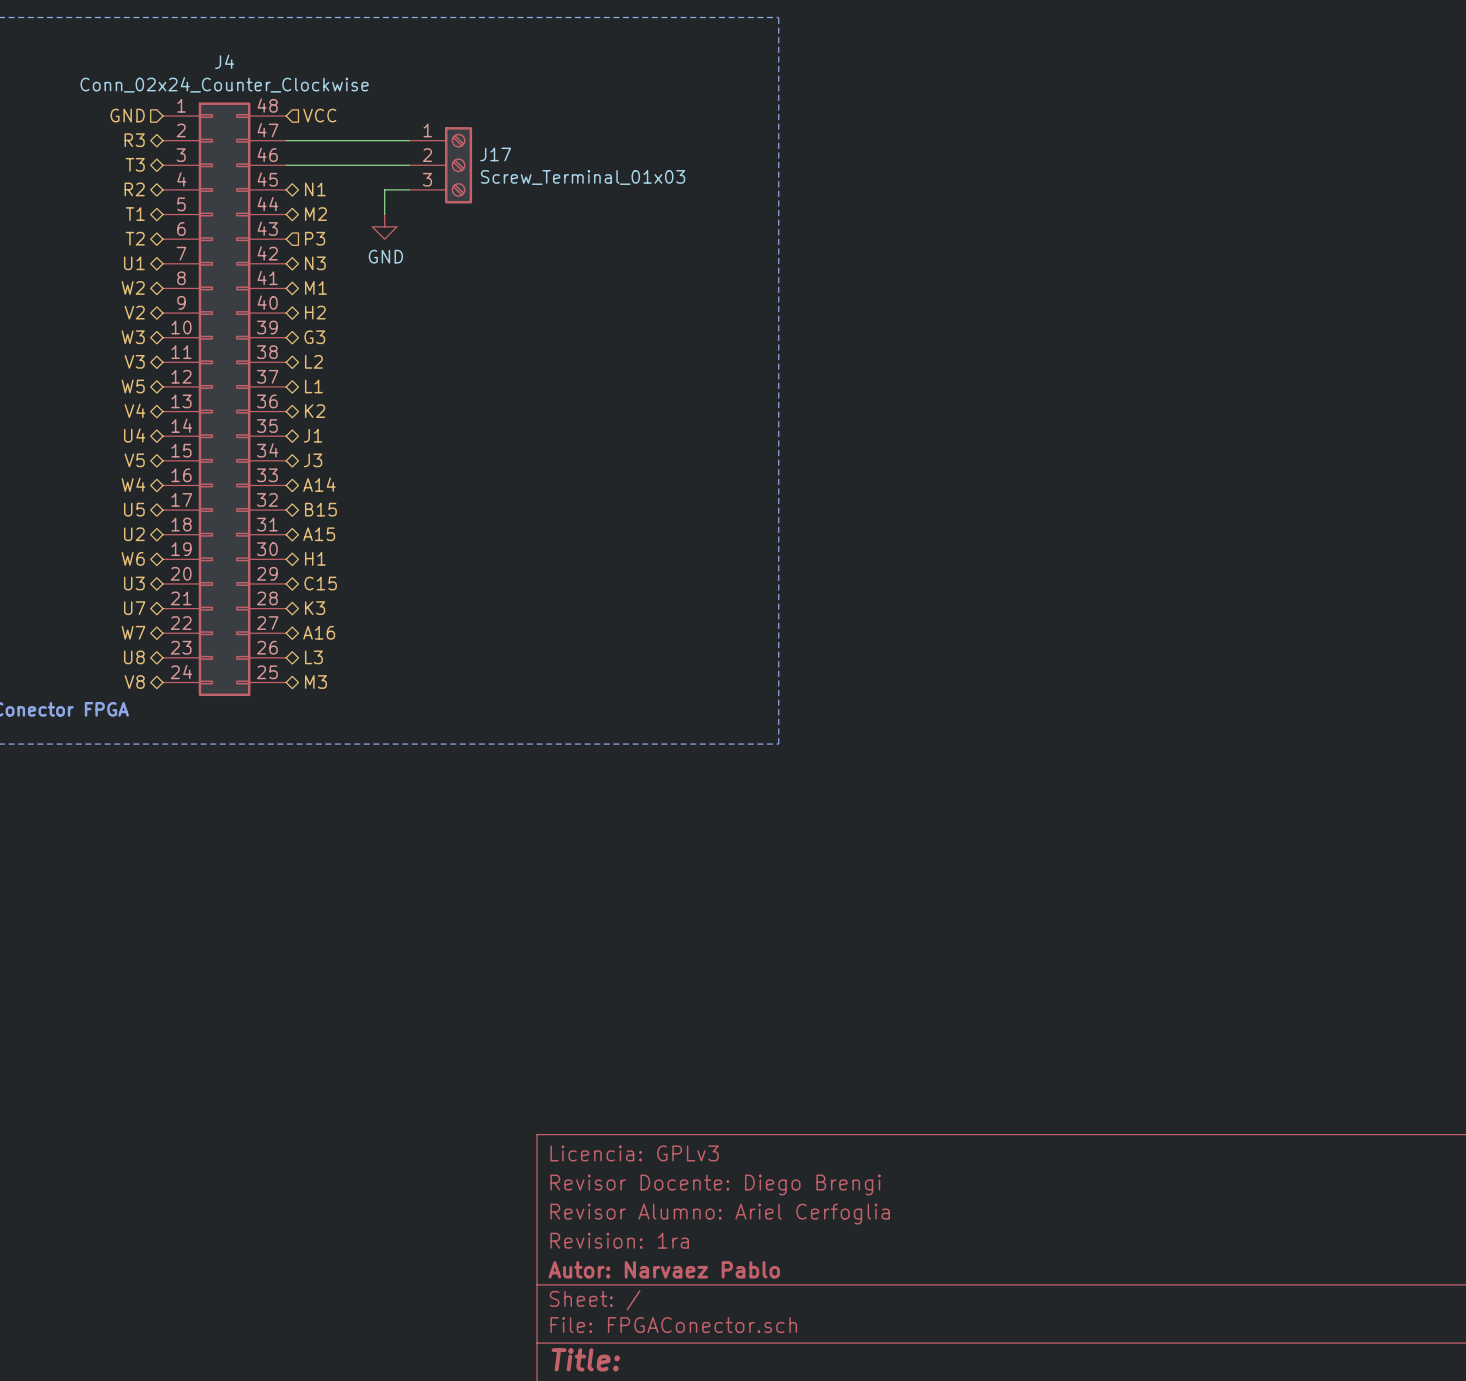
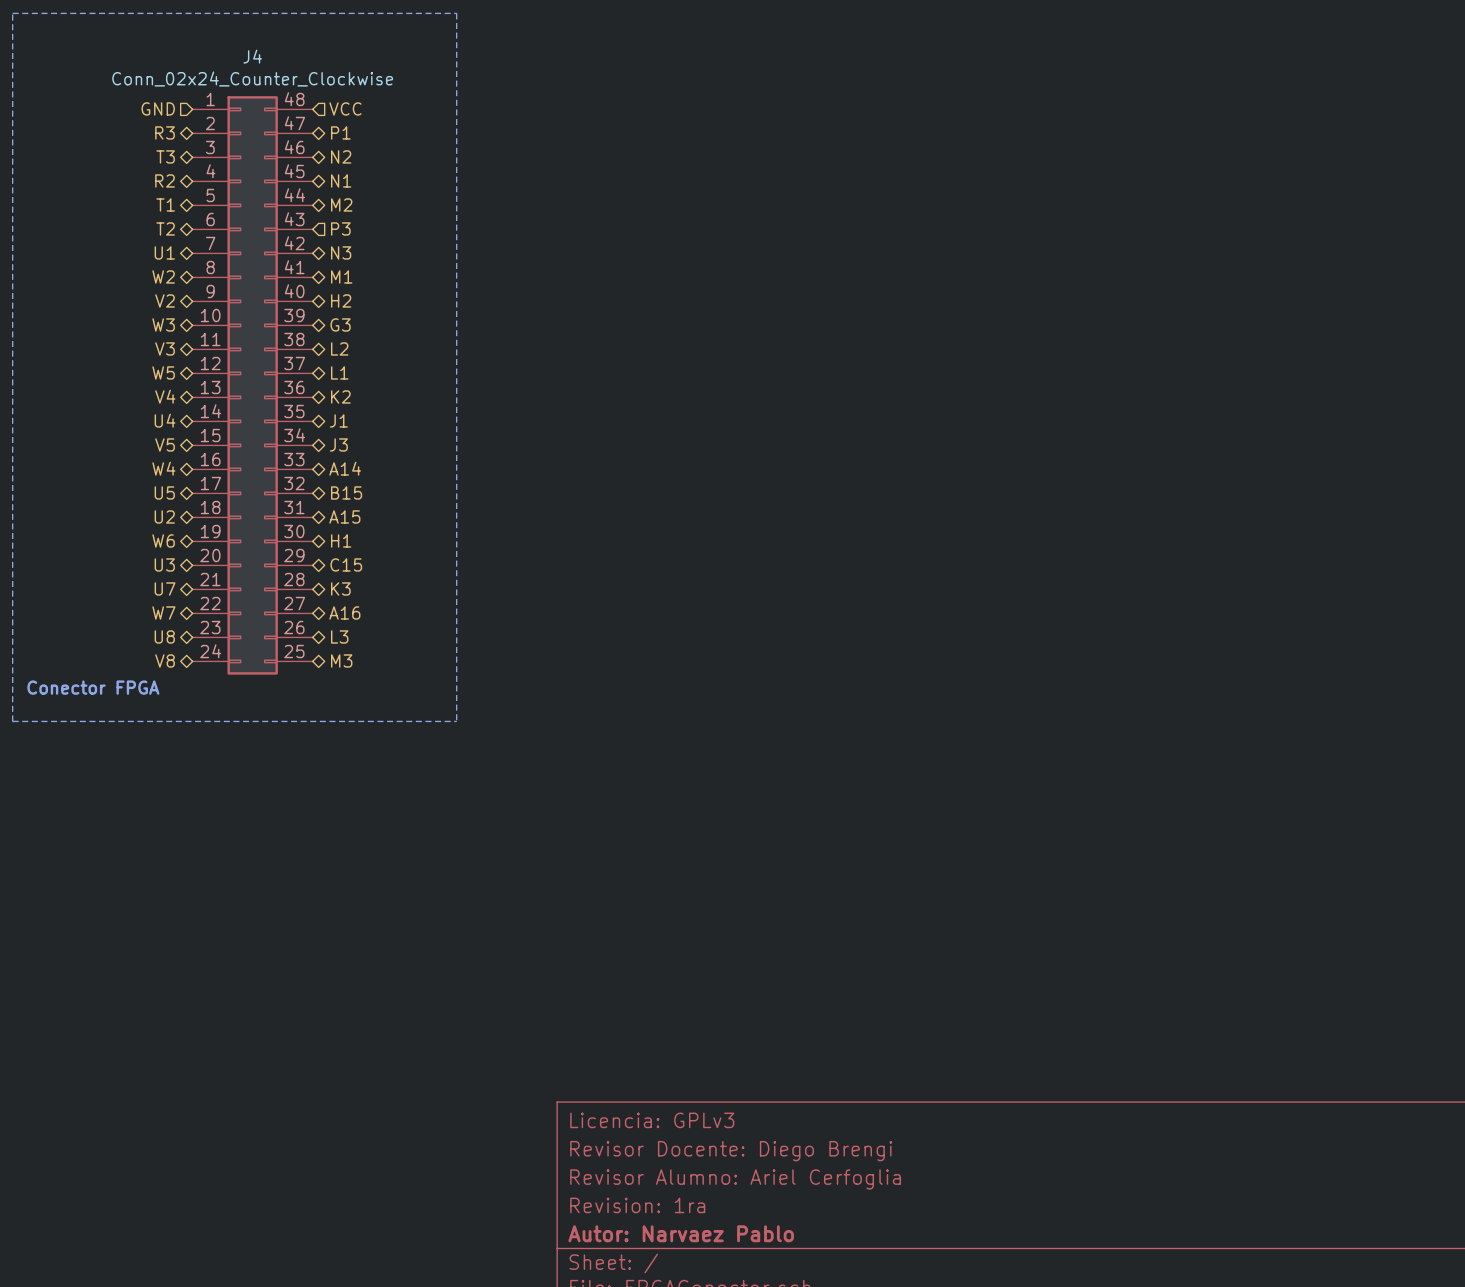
line: (433, 17) (778, 17) (778, 744) (433, 744) -> (456, 13) (456, 721)
wire: (286, 140) (409, 140) -> none
hierarchical label: none -> P1 (340, 132)
hierarchical label: none -> N2 (341, 156)
wire: (286, 165) (409, 165) -> none
J17: Screw_Terminal_01x03 (440, 165) -> none
wire: (409, 189) (384, 189) (384, 214) -> none
power symbol: GND (384, 226) -> none

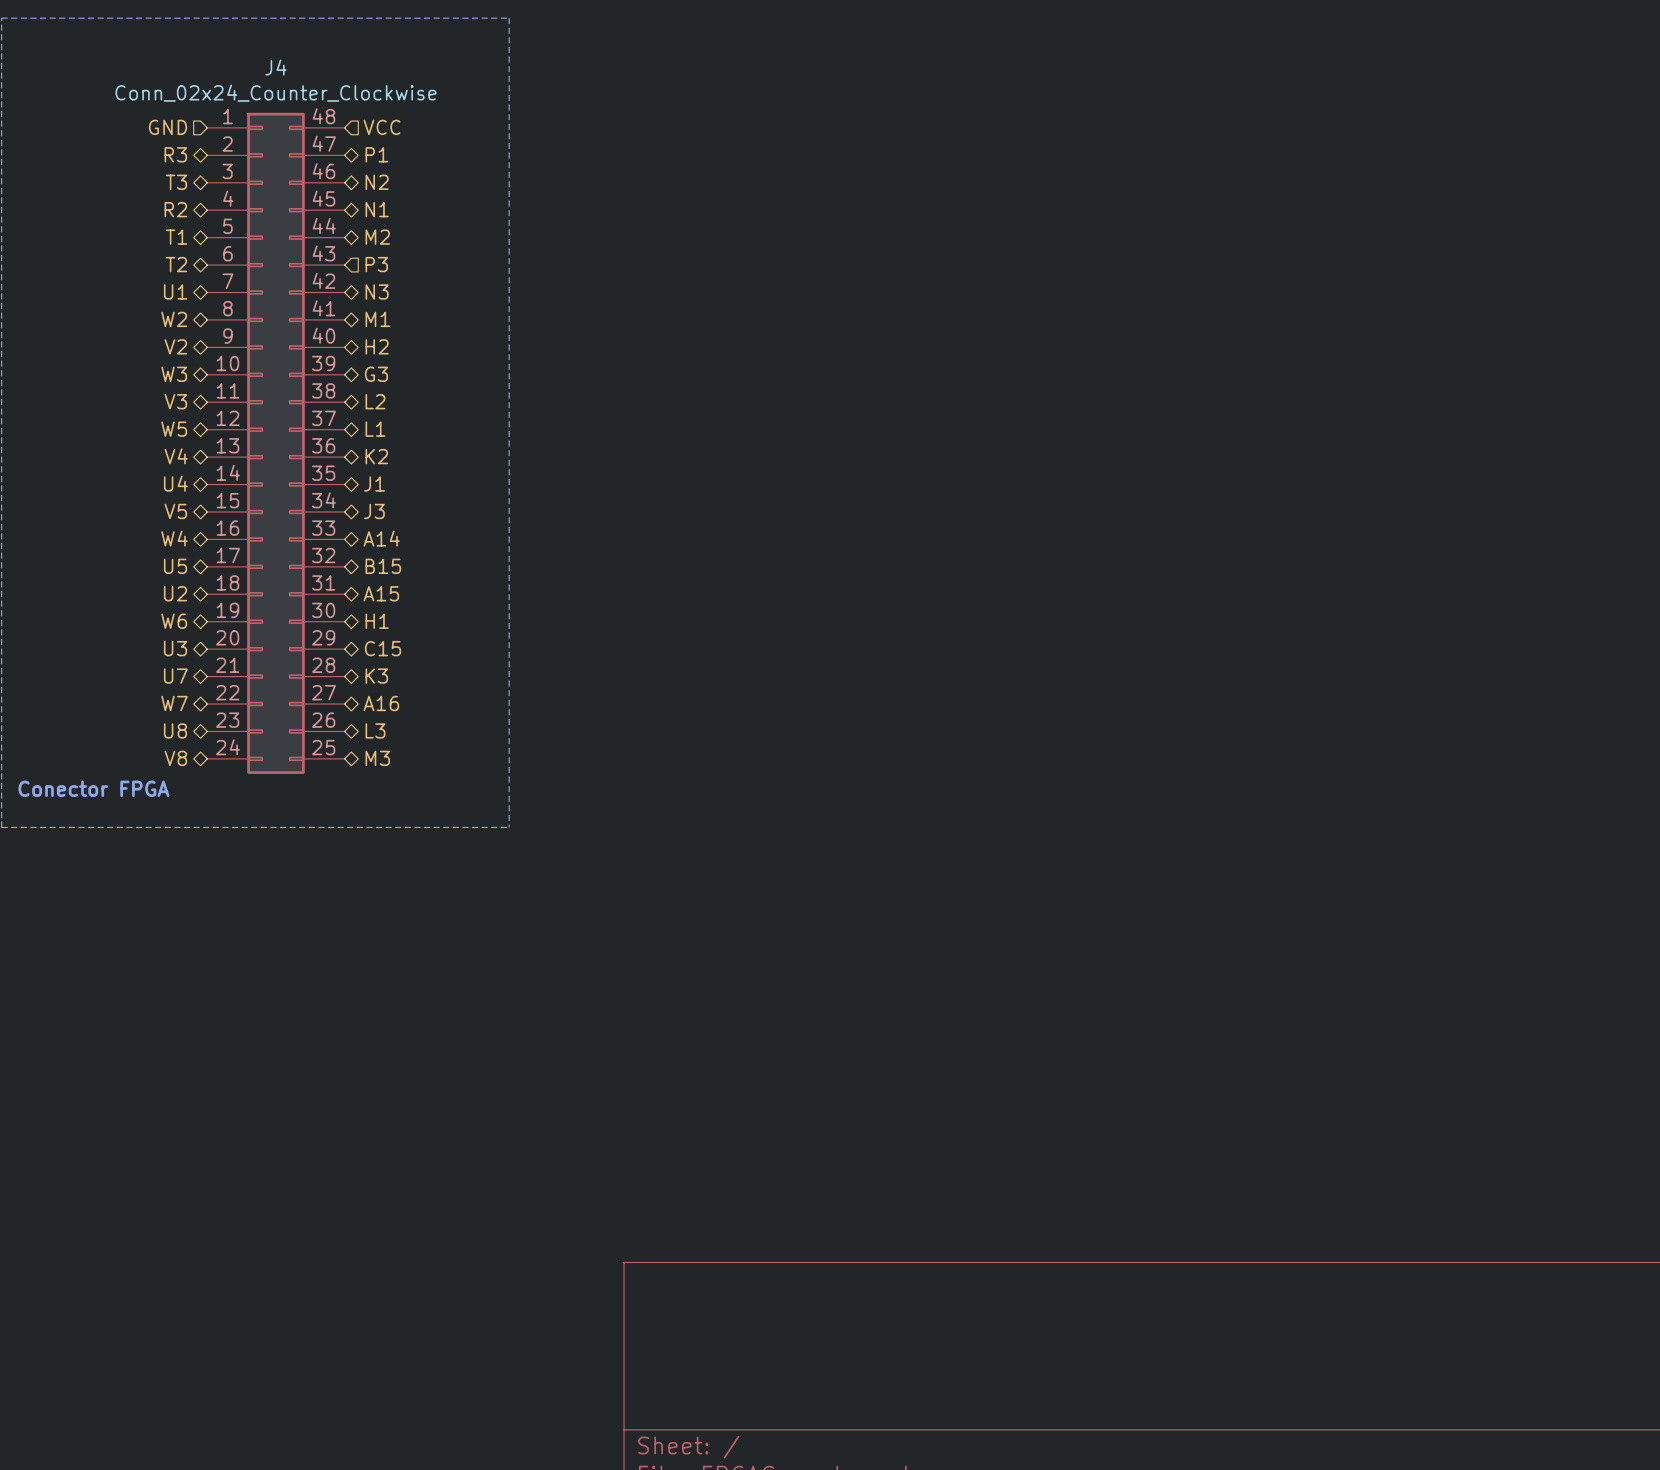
title block: Licencia: GPLv3 (652, 1120) -> none
title block: Revisor Docente: Diego Brengi (731, 1151) -> none
title block: Revisor Alumno: Ariel Cerfoglia (735, 1179) -> none
title block: Revision: 1ra (637, 1205) -> none
title block: Autor: Narvaez Pablo (681, 1233) -> none

